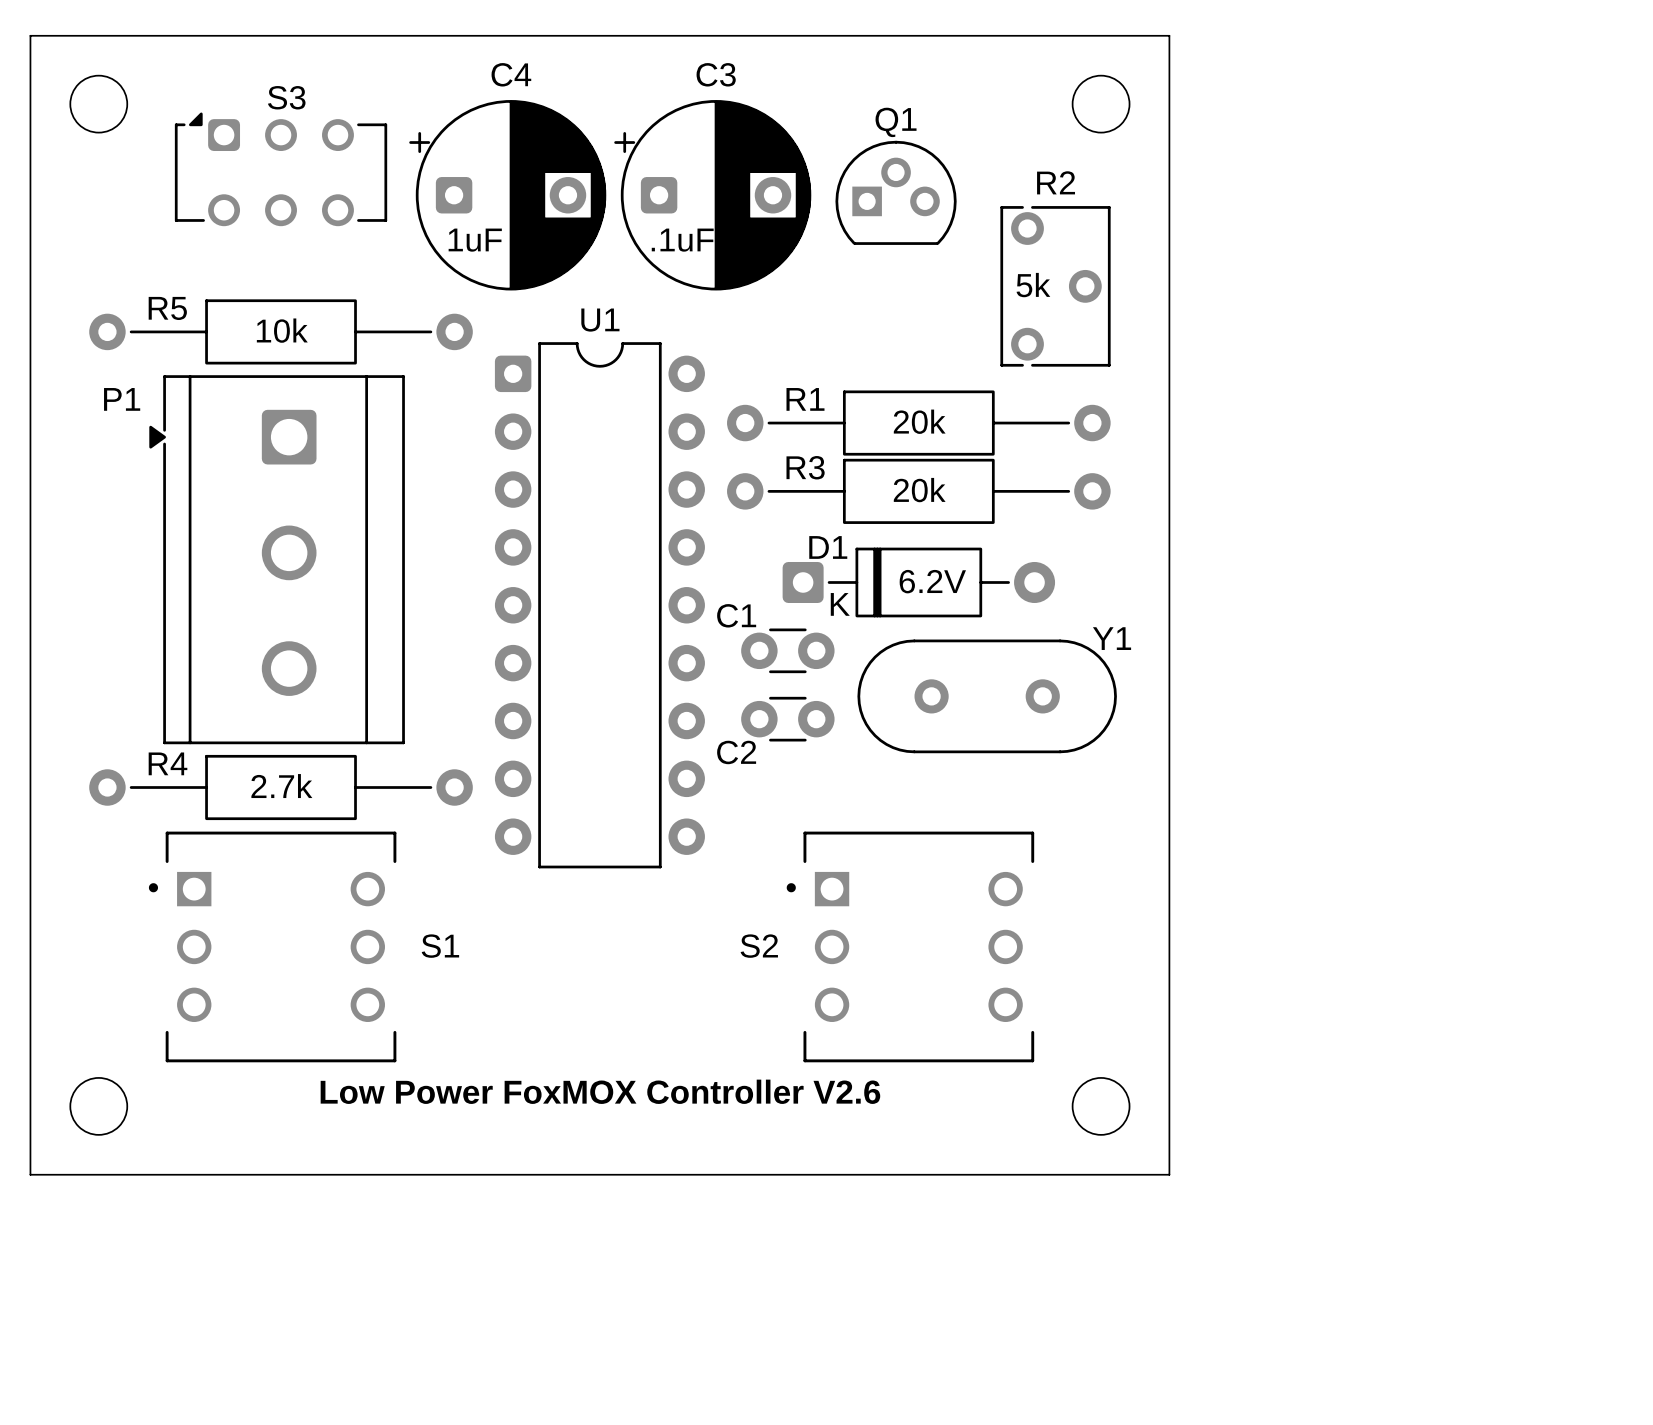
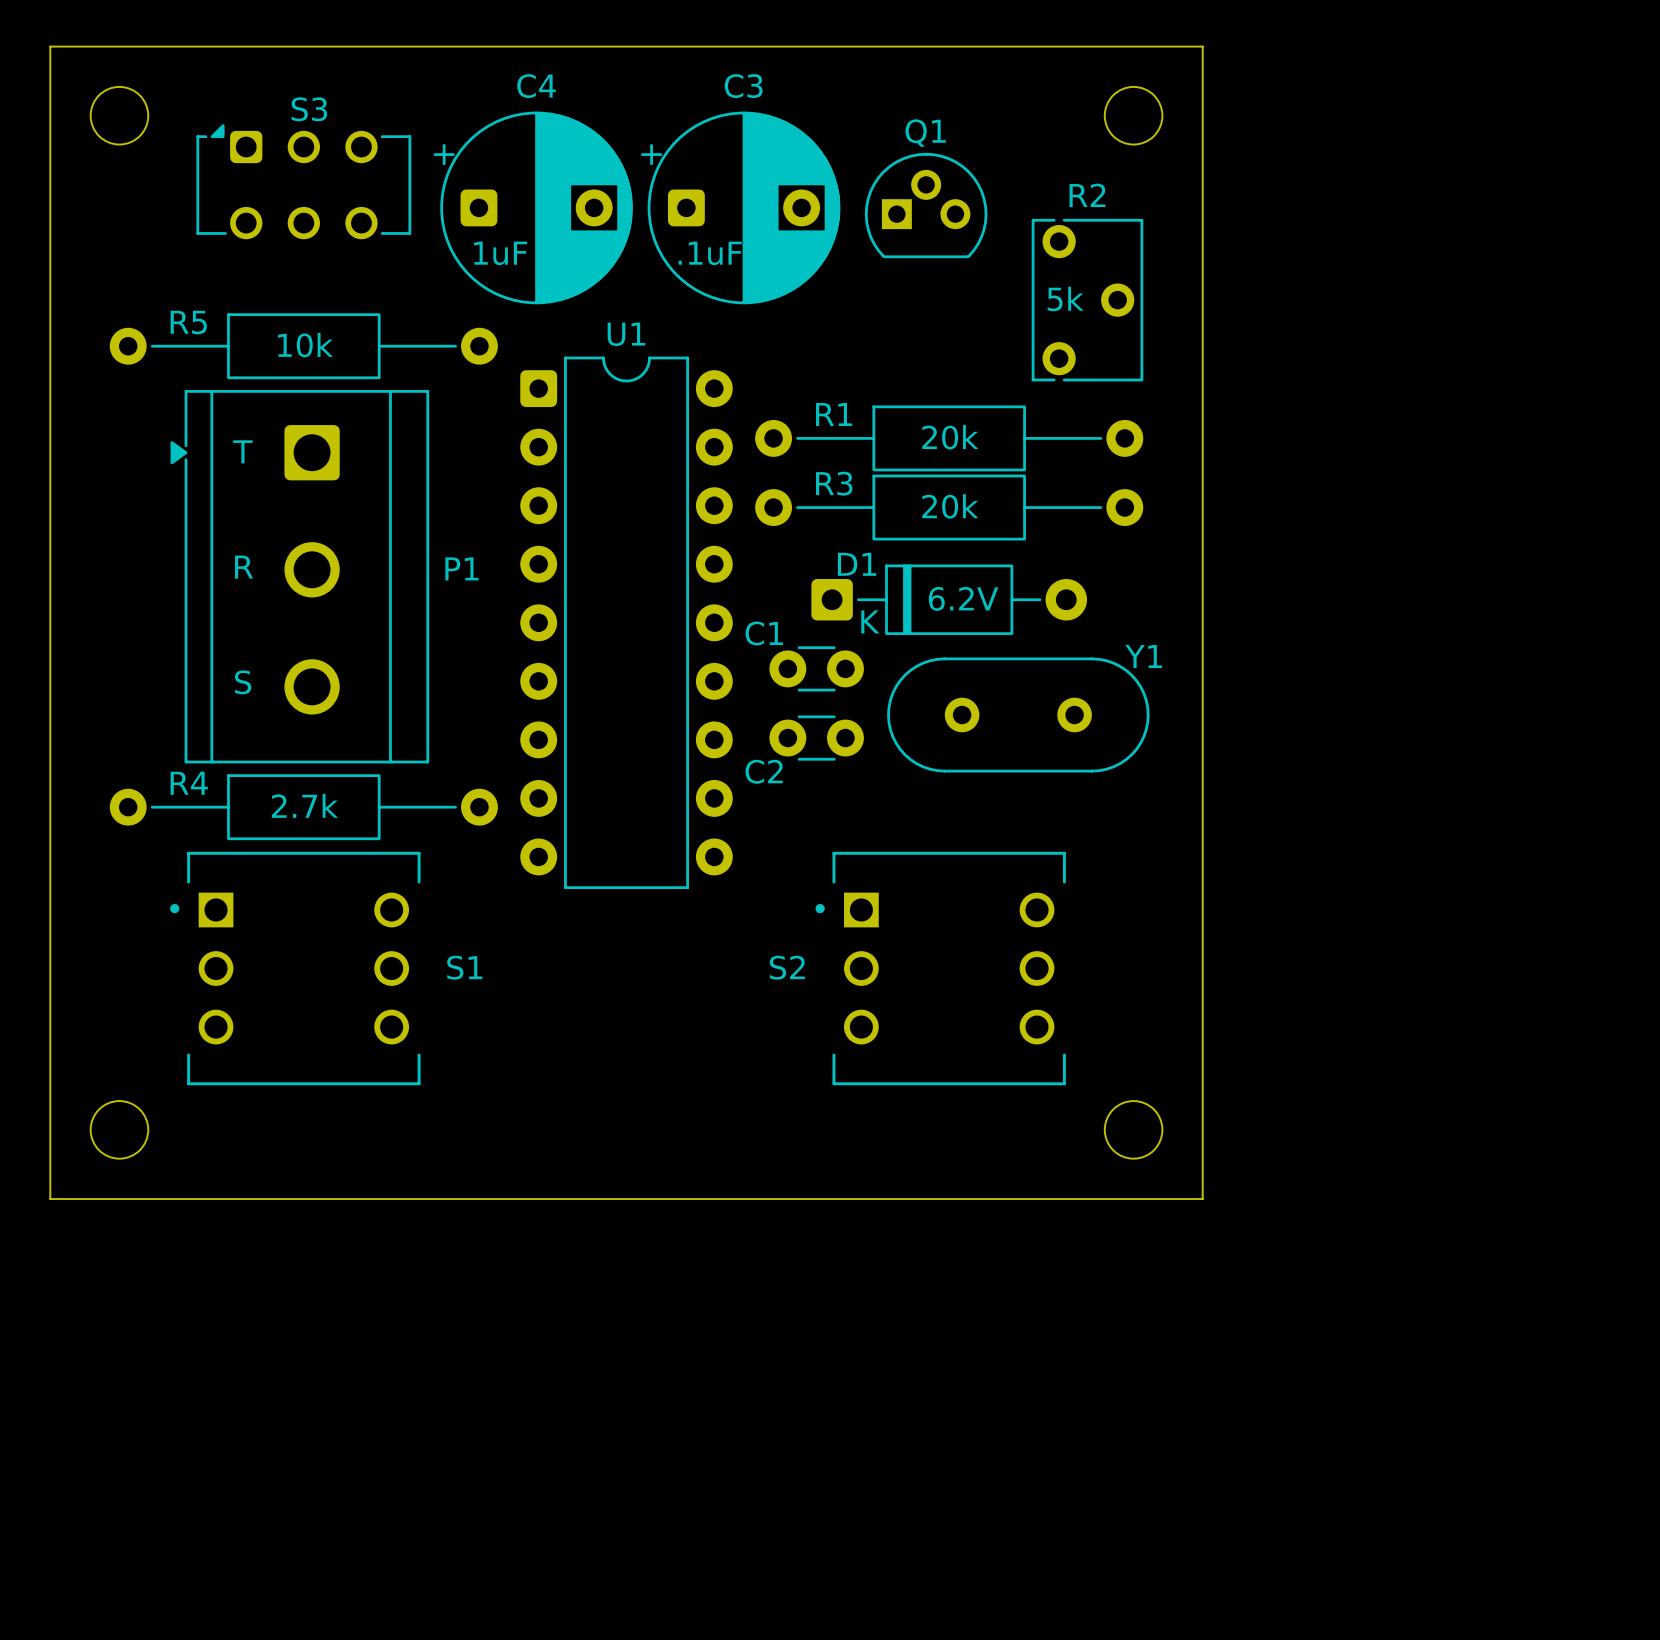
P1 name position: P1 (122, 399) -> P1 (461, 568)
P1 text: none -> T (242, 451)
P1 text: none -> R (244, 567)
P1 text: none -> S (243, 682)
text: Low Power FoxMOX Controller V2.6 (600, 1091) -> none

